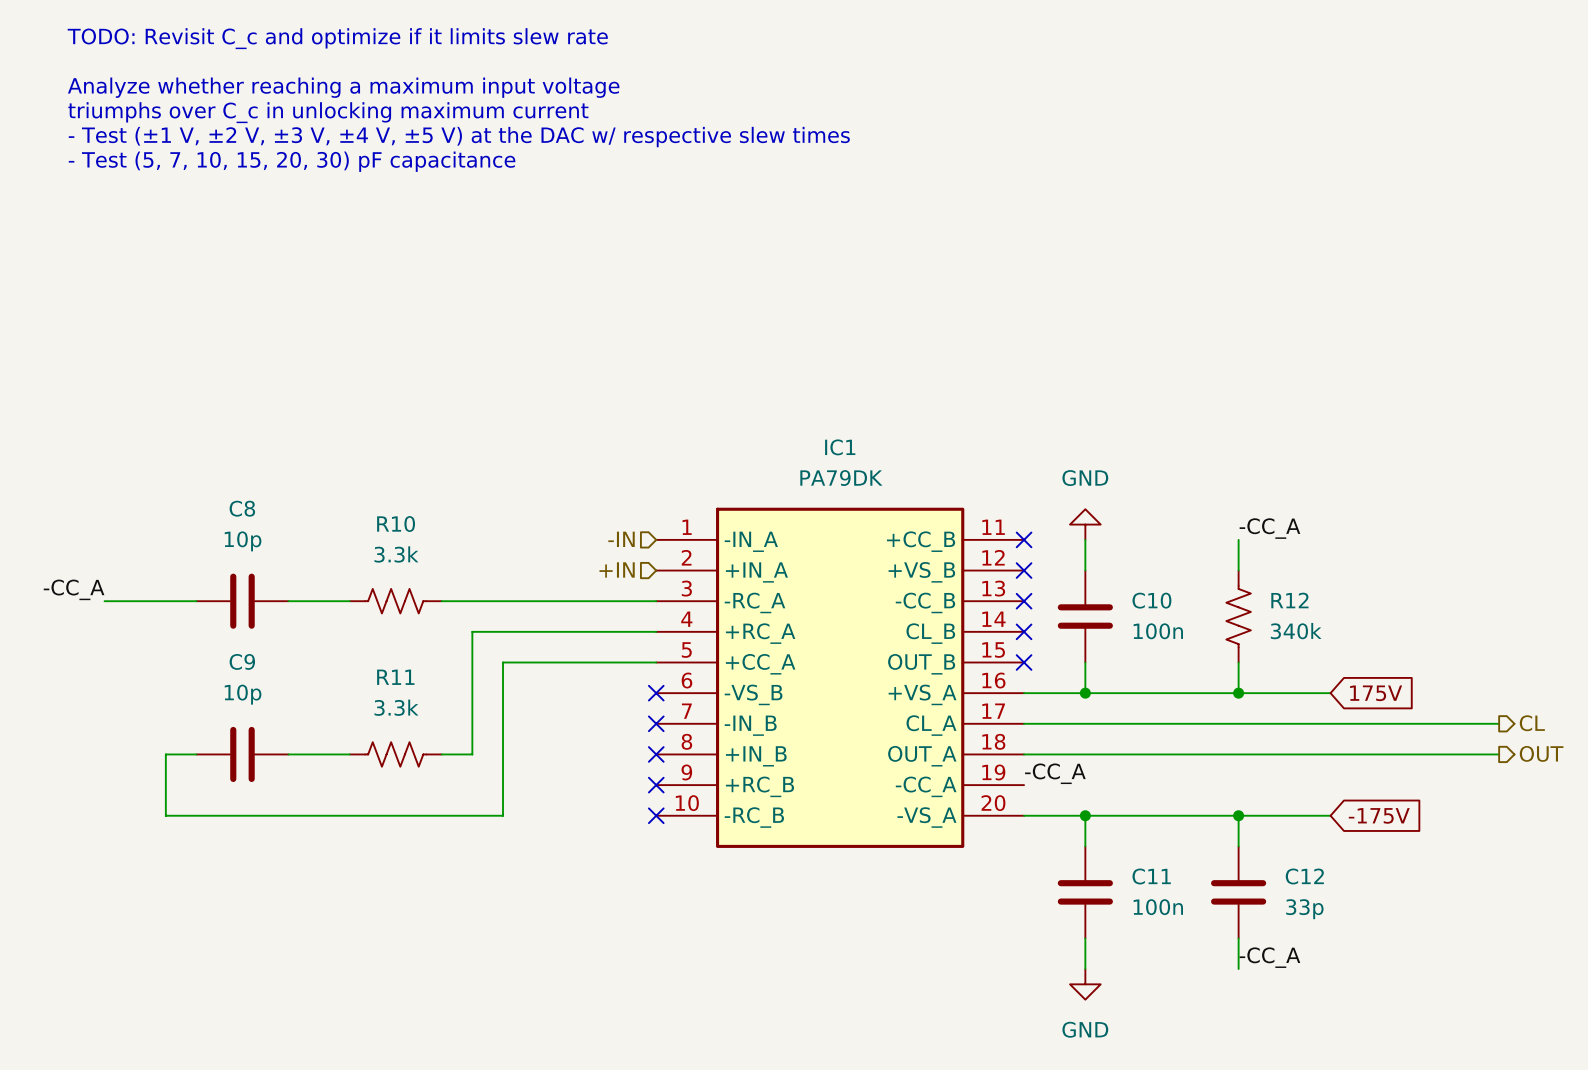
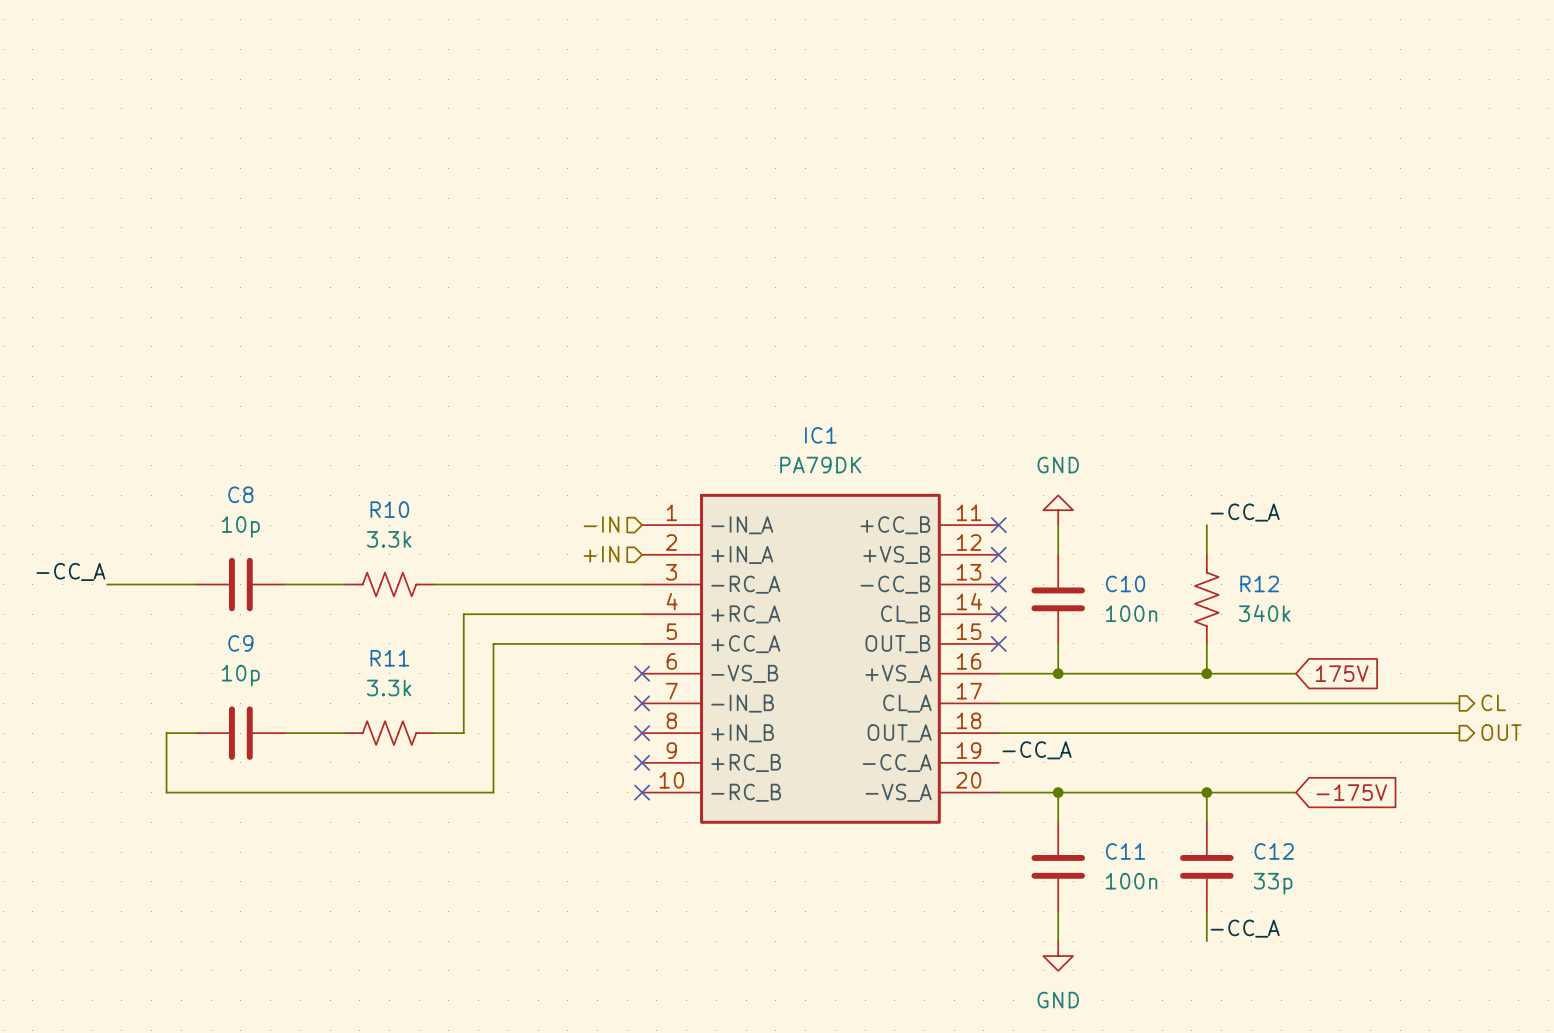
text: TODO: Revisit C_c and optimize if it limits slew rate (337, 38) -> none
text: Analyze whether reaching a maximum input voltage (343, 87) -> none
text: triumphs over C_c in unlocking maximum current (328, 112) -> none
text: - Test (±1 V, ±2 V, ±3 V, ±4 V, ±5 V) at the DAC w/ respective slew times (459, 137) -> none
text: - Test (5, 7, 10, 15, 20, 30) pF capacitance (292, 161) -> none

